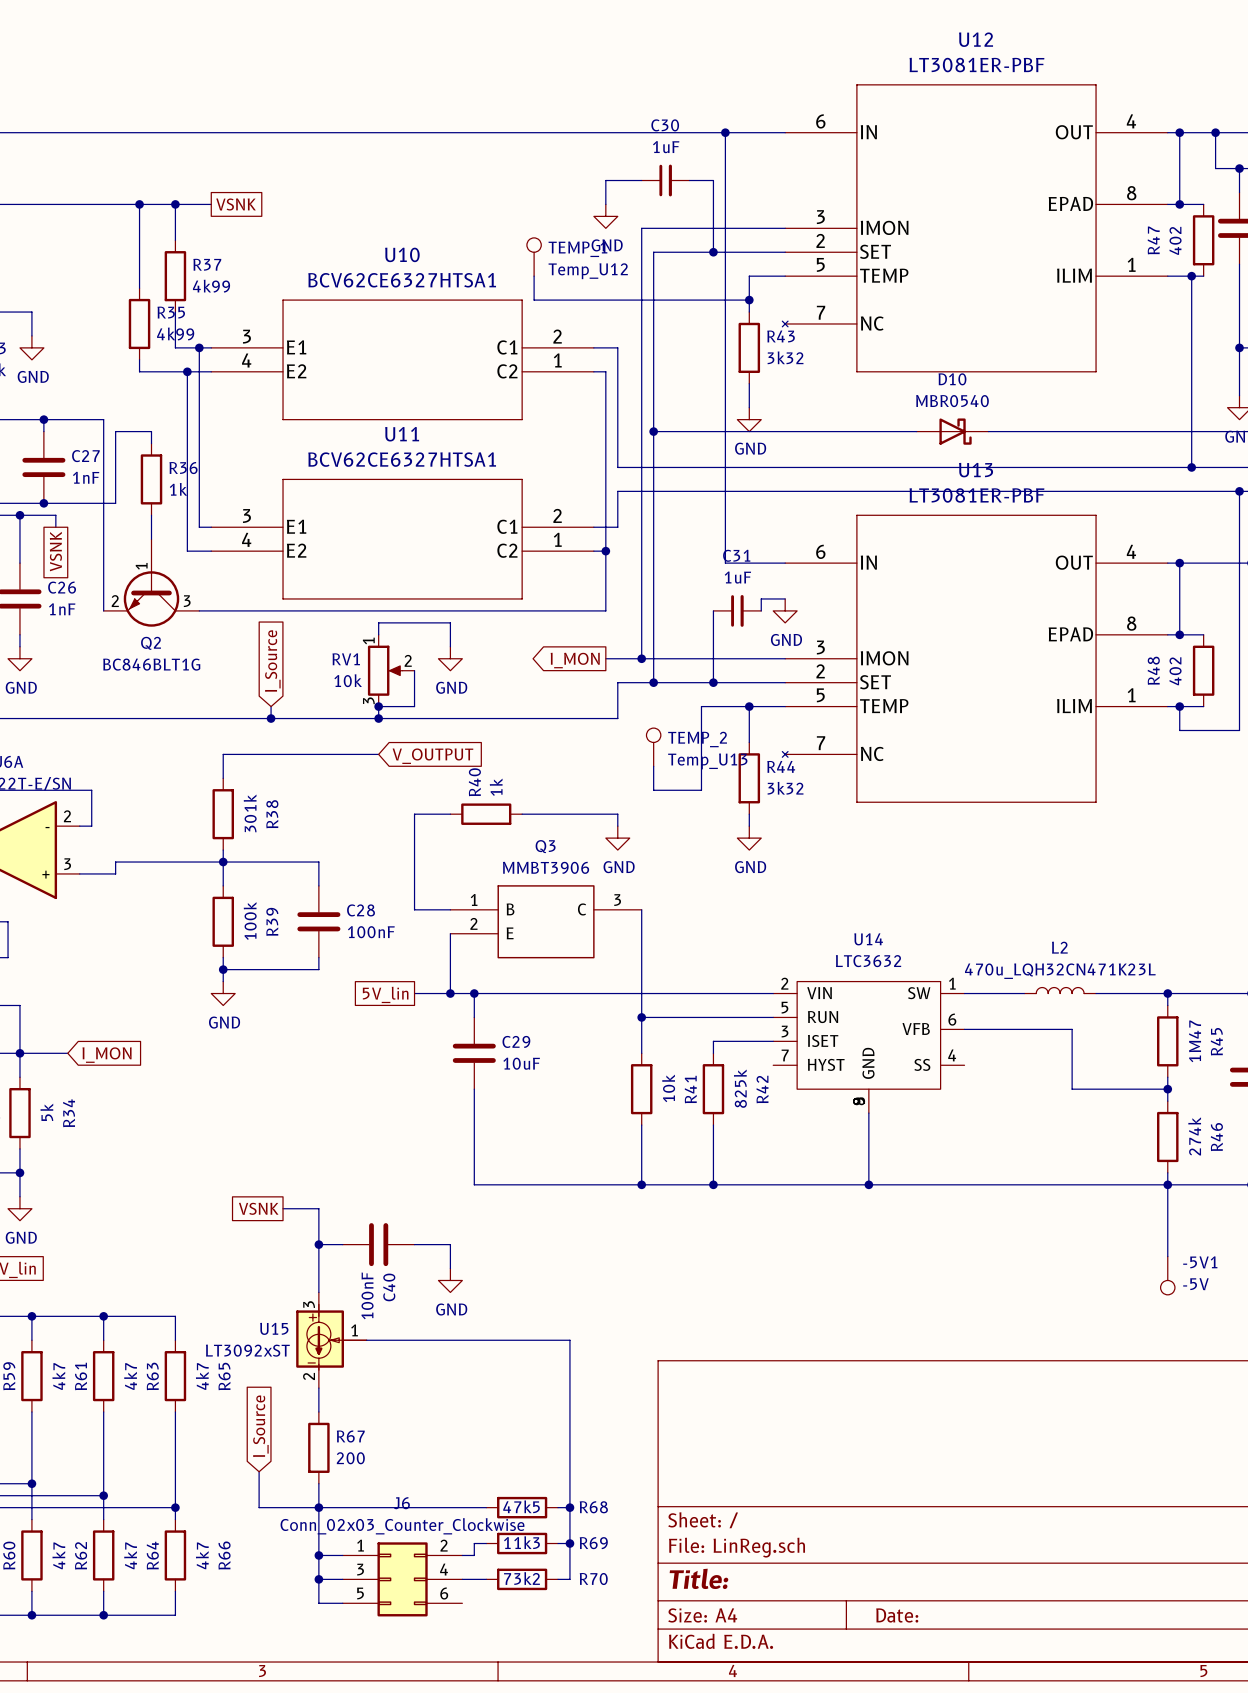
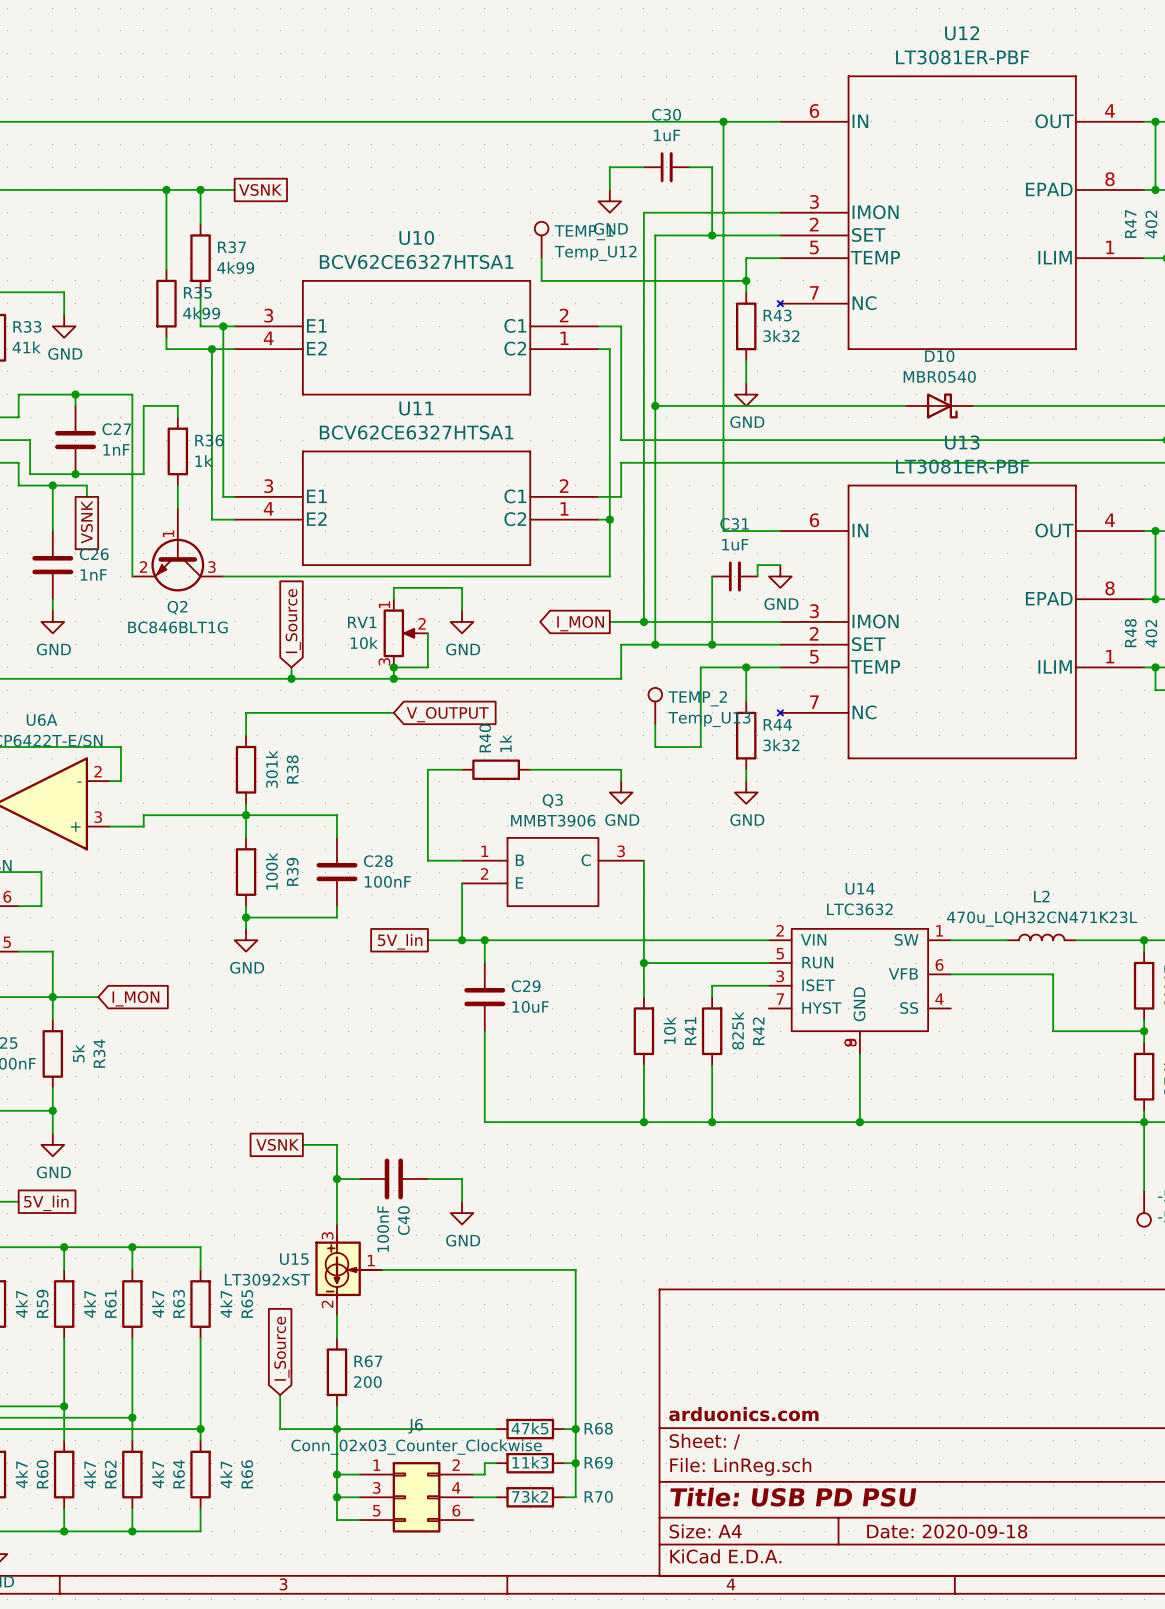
title block: none -> arduonics.com (743, 1414)
title block: Title: (698, 1578) -> Title: USB PD PSU (793, 1497)
title block: Date: (897, 1615) -> Date: 2020-09-18 (947, 1531)

